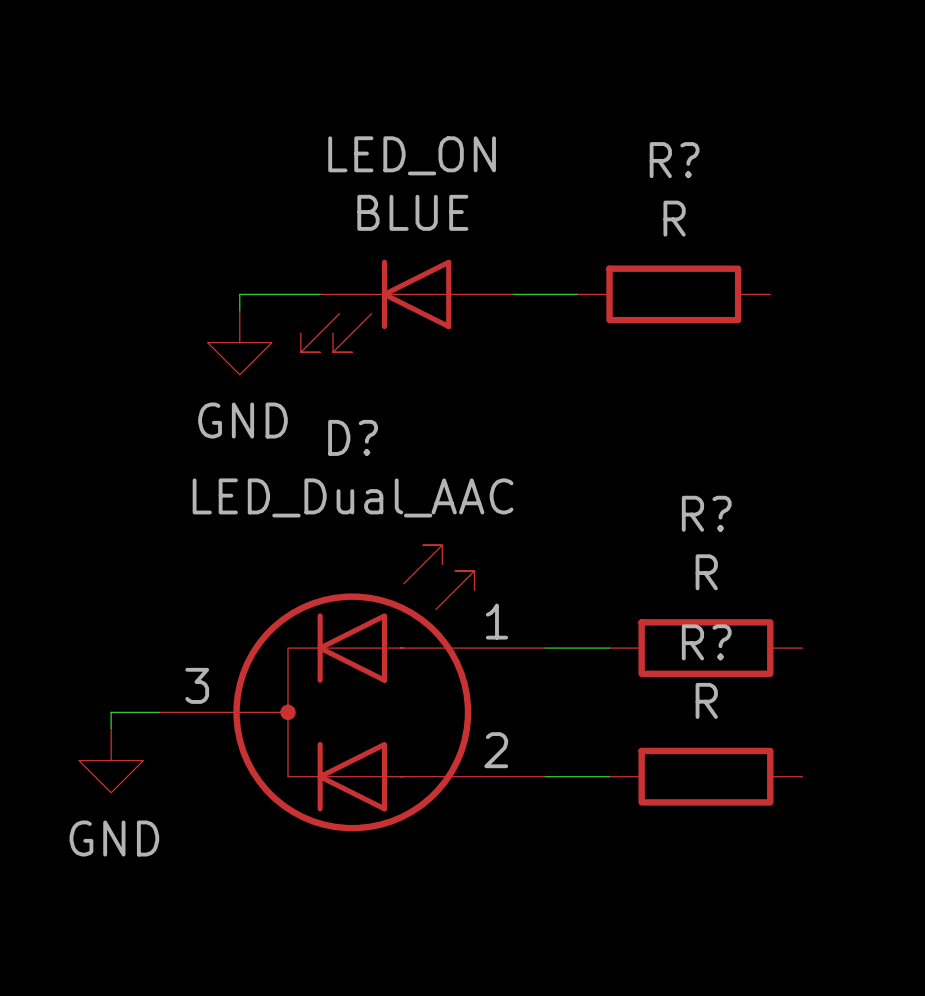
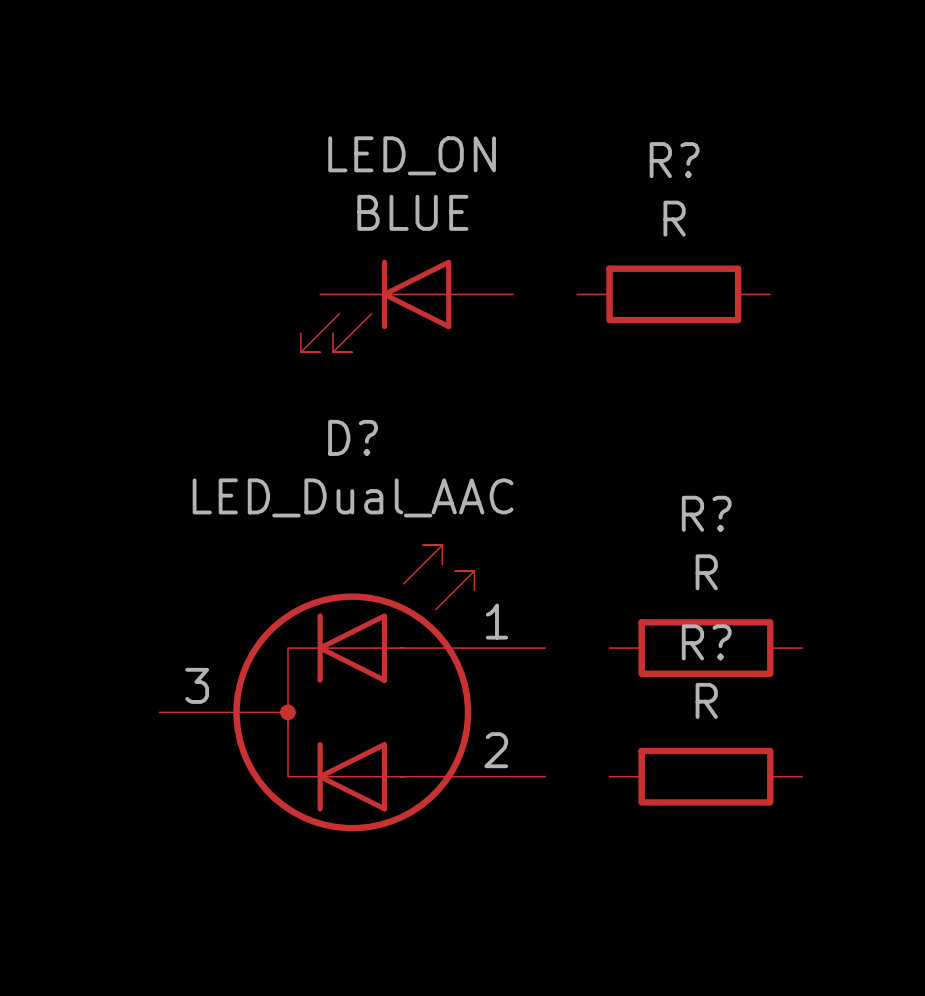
wire: (320, 294) (239, 294) (239, 310) -> none
wire: (513, 294) (577, 294) -> none
power symbol: GND (239, 342) -> none
wire: (545, 648) (609, 648) -> none
wire: (159, 712) (111, 712) (111, 728) -> none
power symbol: GND (111, 760) -> none
wire: (545, 776) (609, 776) -> none

